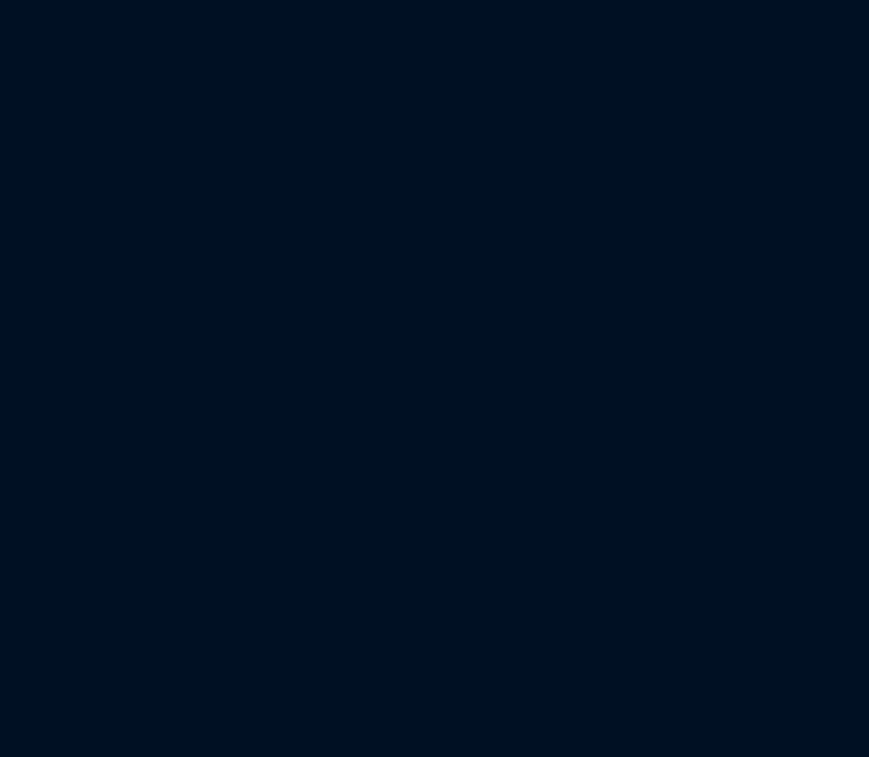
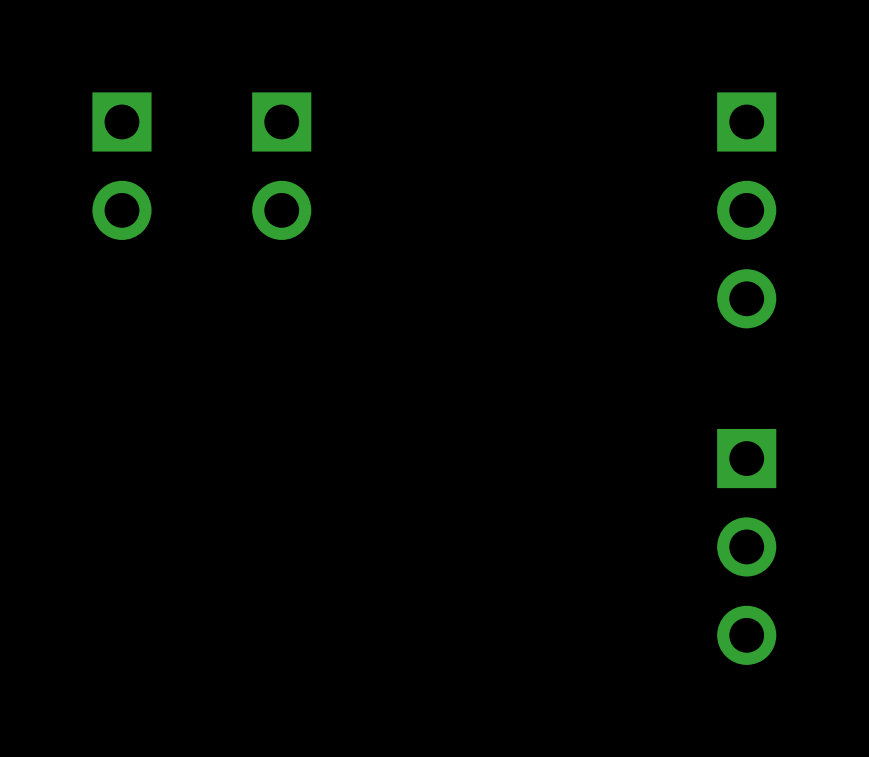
part: none -> (121, 166)
part: none -> (281, 166)
part: none -> (746, 210)
part: none -> (746, 546)

